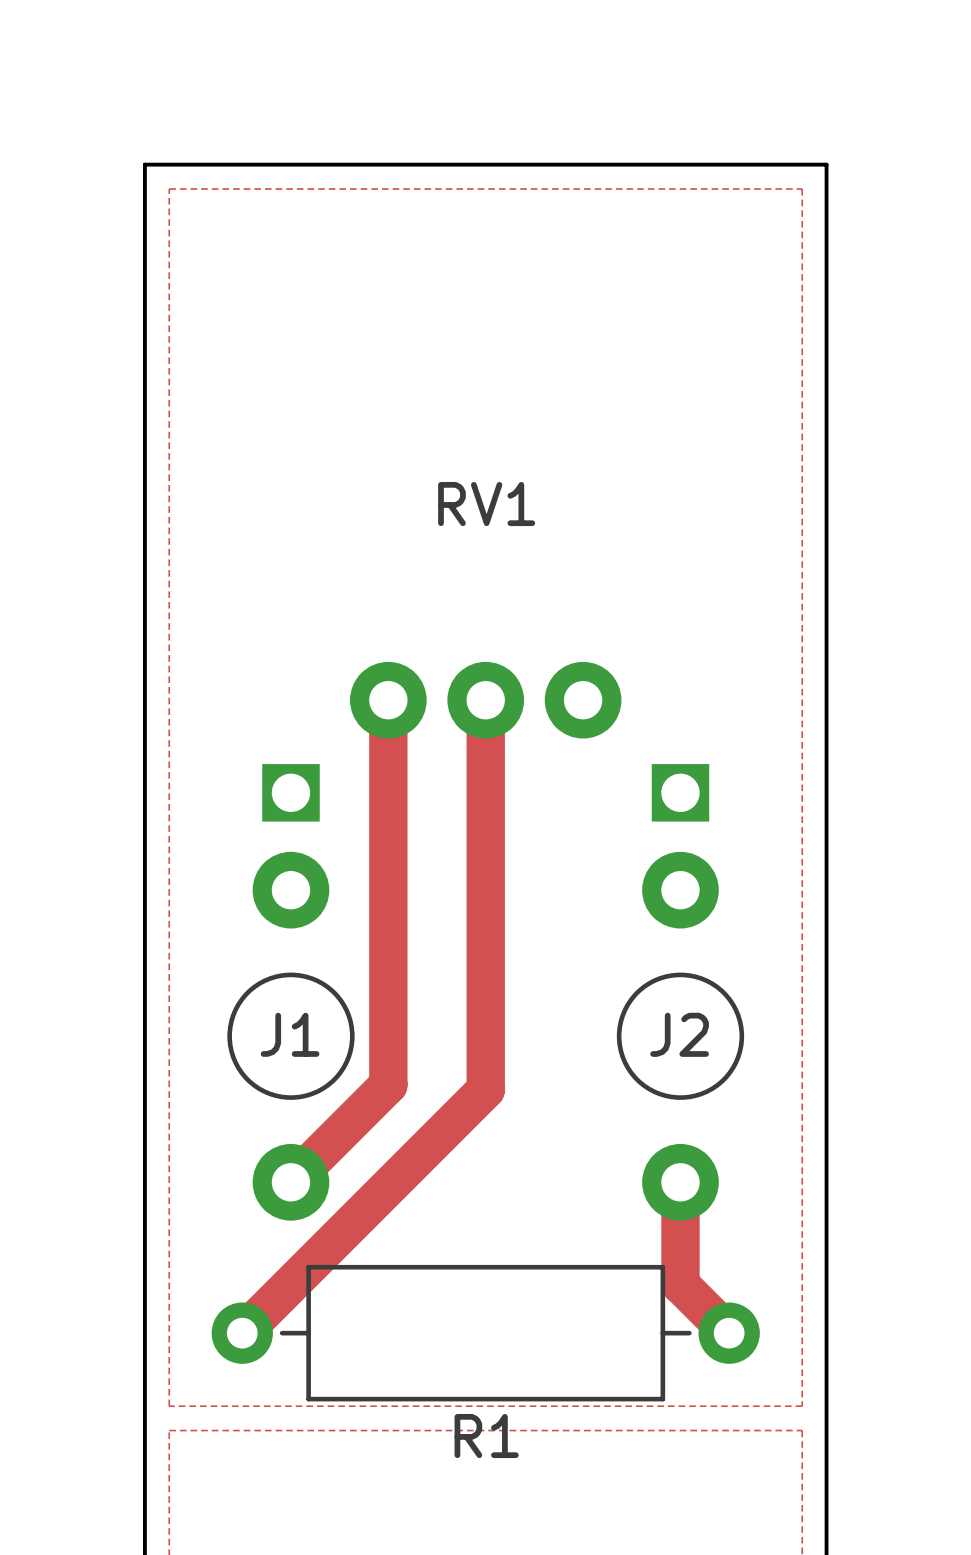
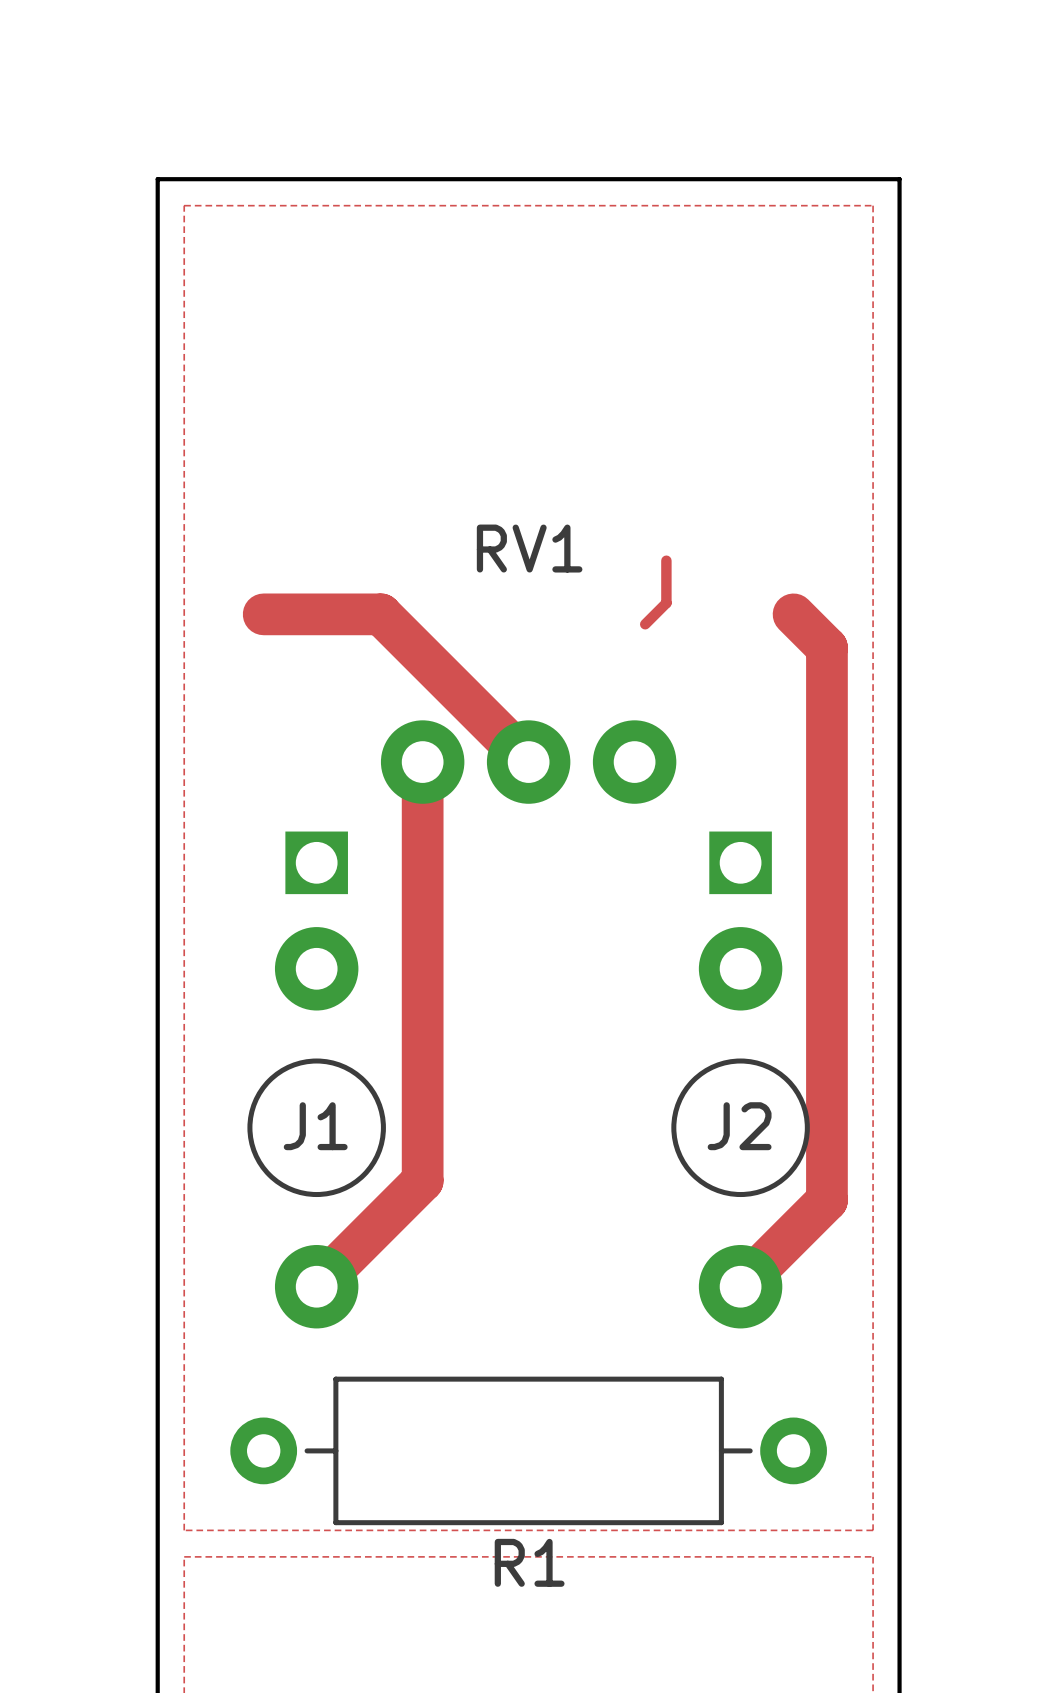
track: none -> (666, 560) (666, 603) (645, 624)
track: (485, 700) (485, 1089) (242, 1333) -> (528, 762) (380, 614) (263, 614)
track: (680, 1182) (680, 1284) (729, 1333) -> (740, 1286) (826, 1200) (826, 647) (793, 614)

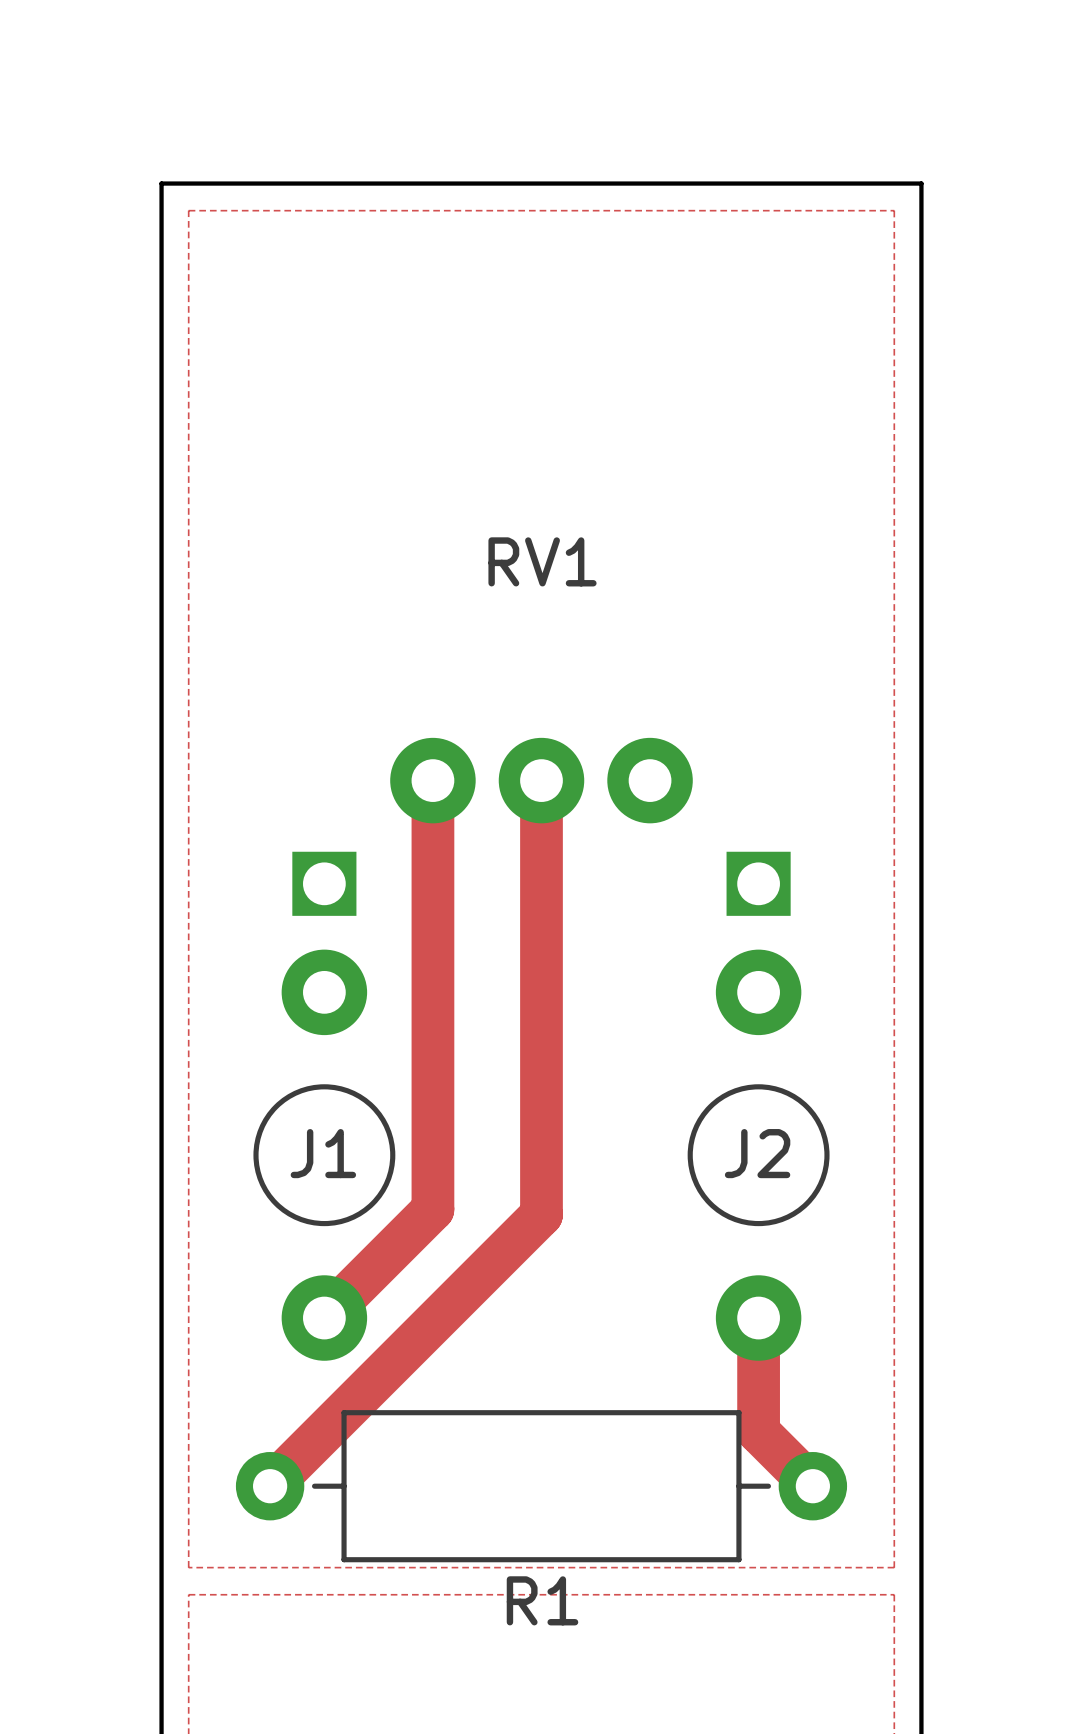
track: (666, 560) (666, 603) (645, 624) -> none
track: (263, 614) (380, 614) (528, 762) -> (270, 1486) (541, 1214) (541, 780)
track: (793, 614) (826, 647) (826, 1200) (740, 1286) -> (812, 1486) (758, 1431) (758, 1318)

